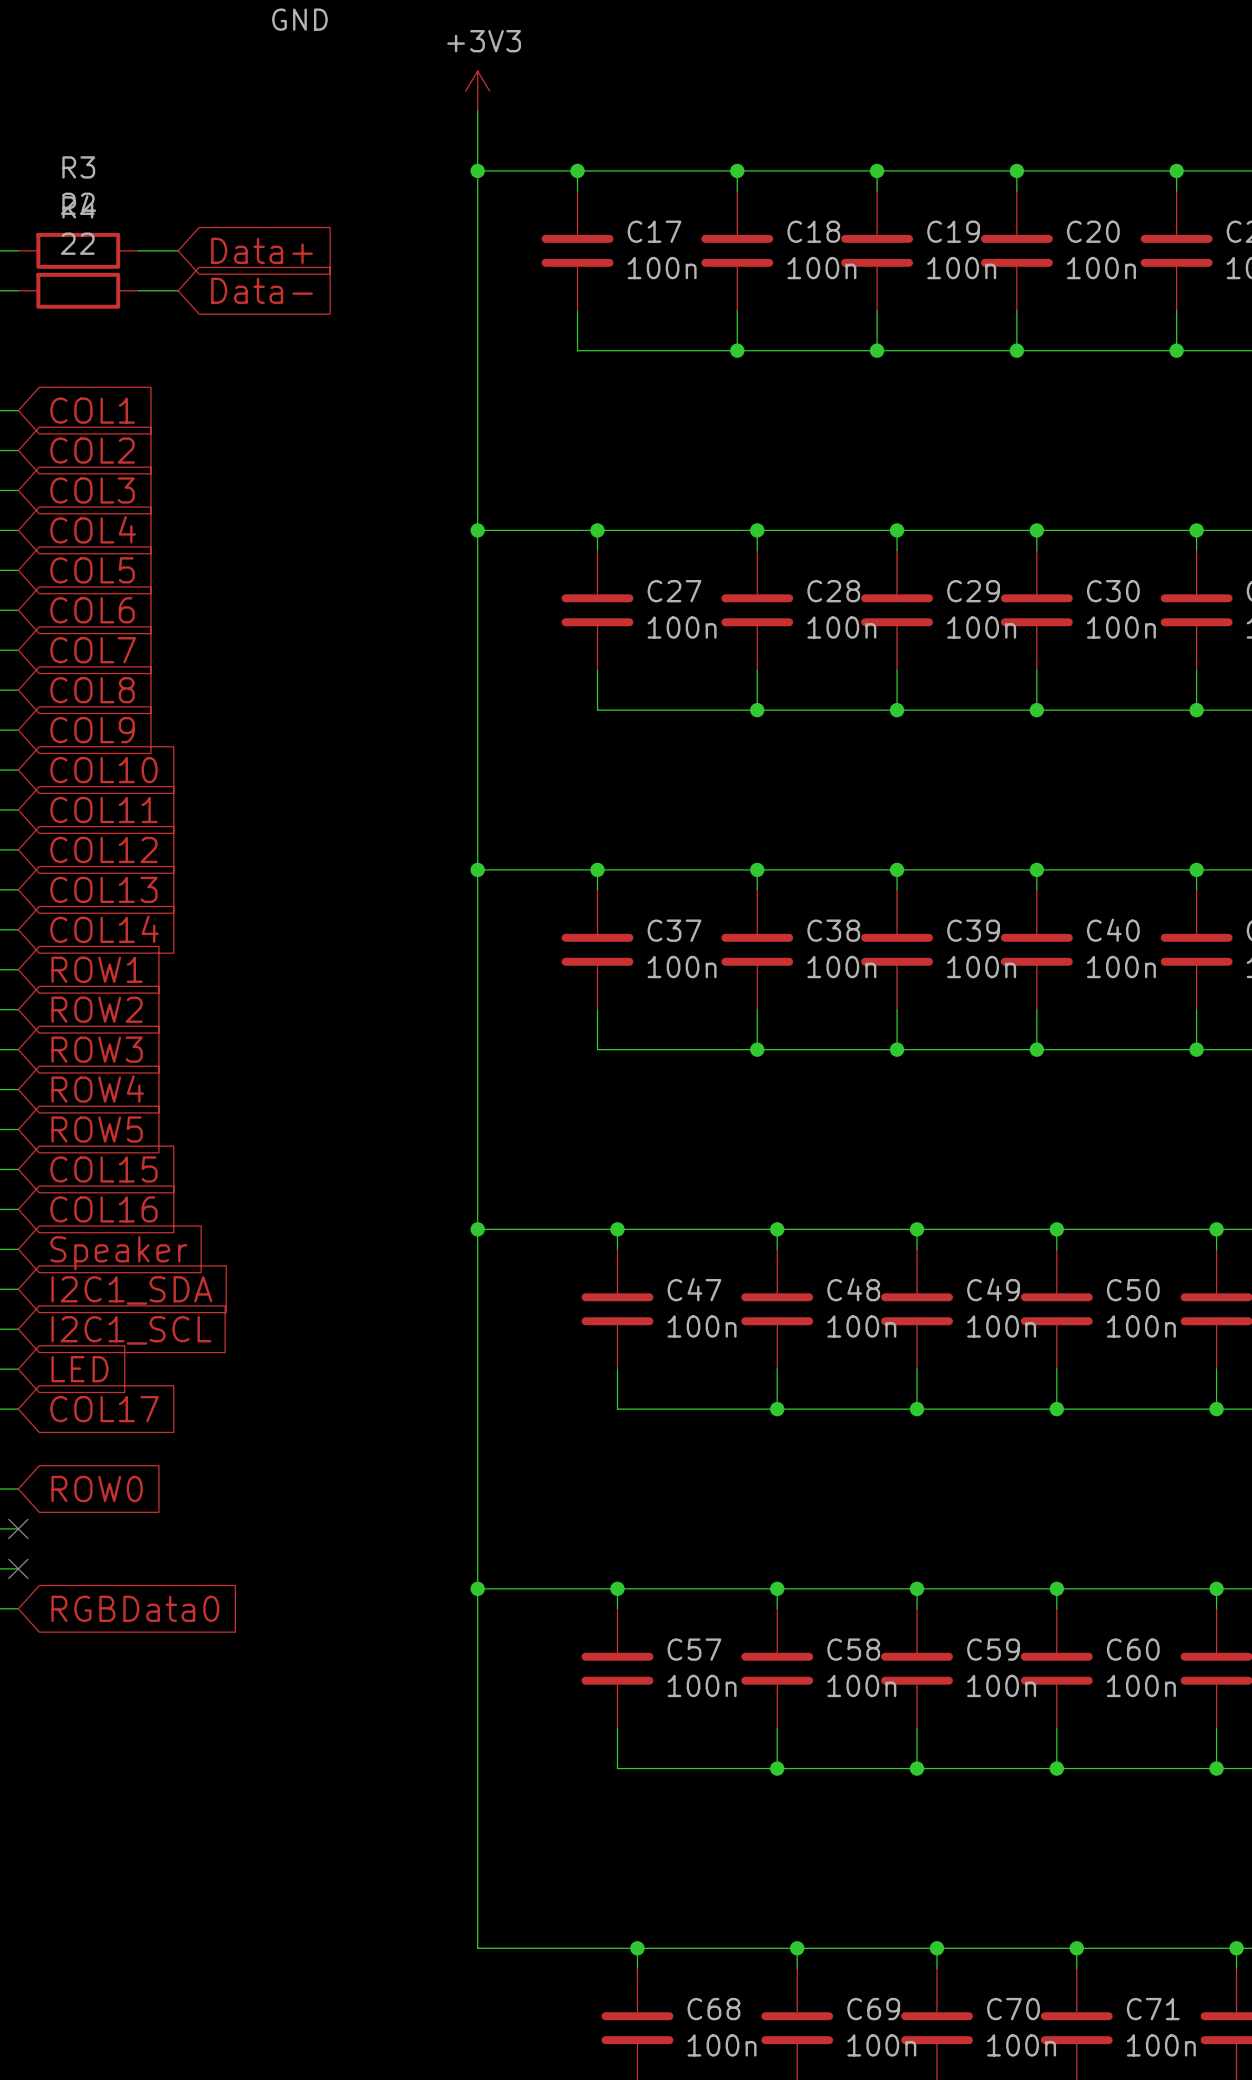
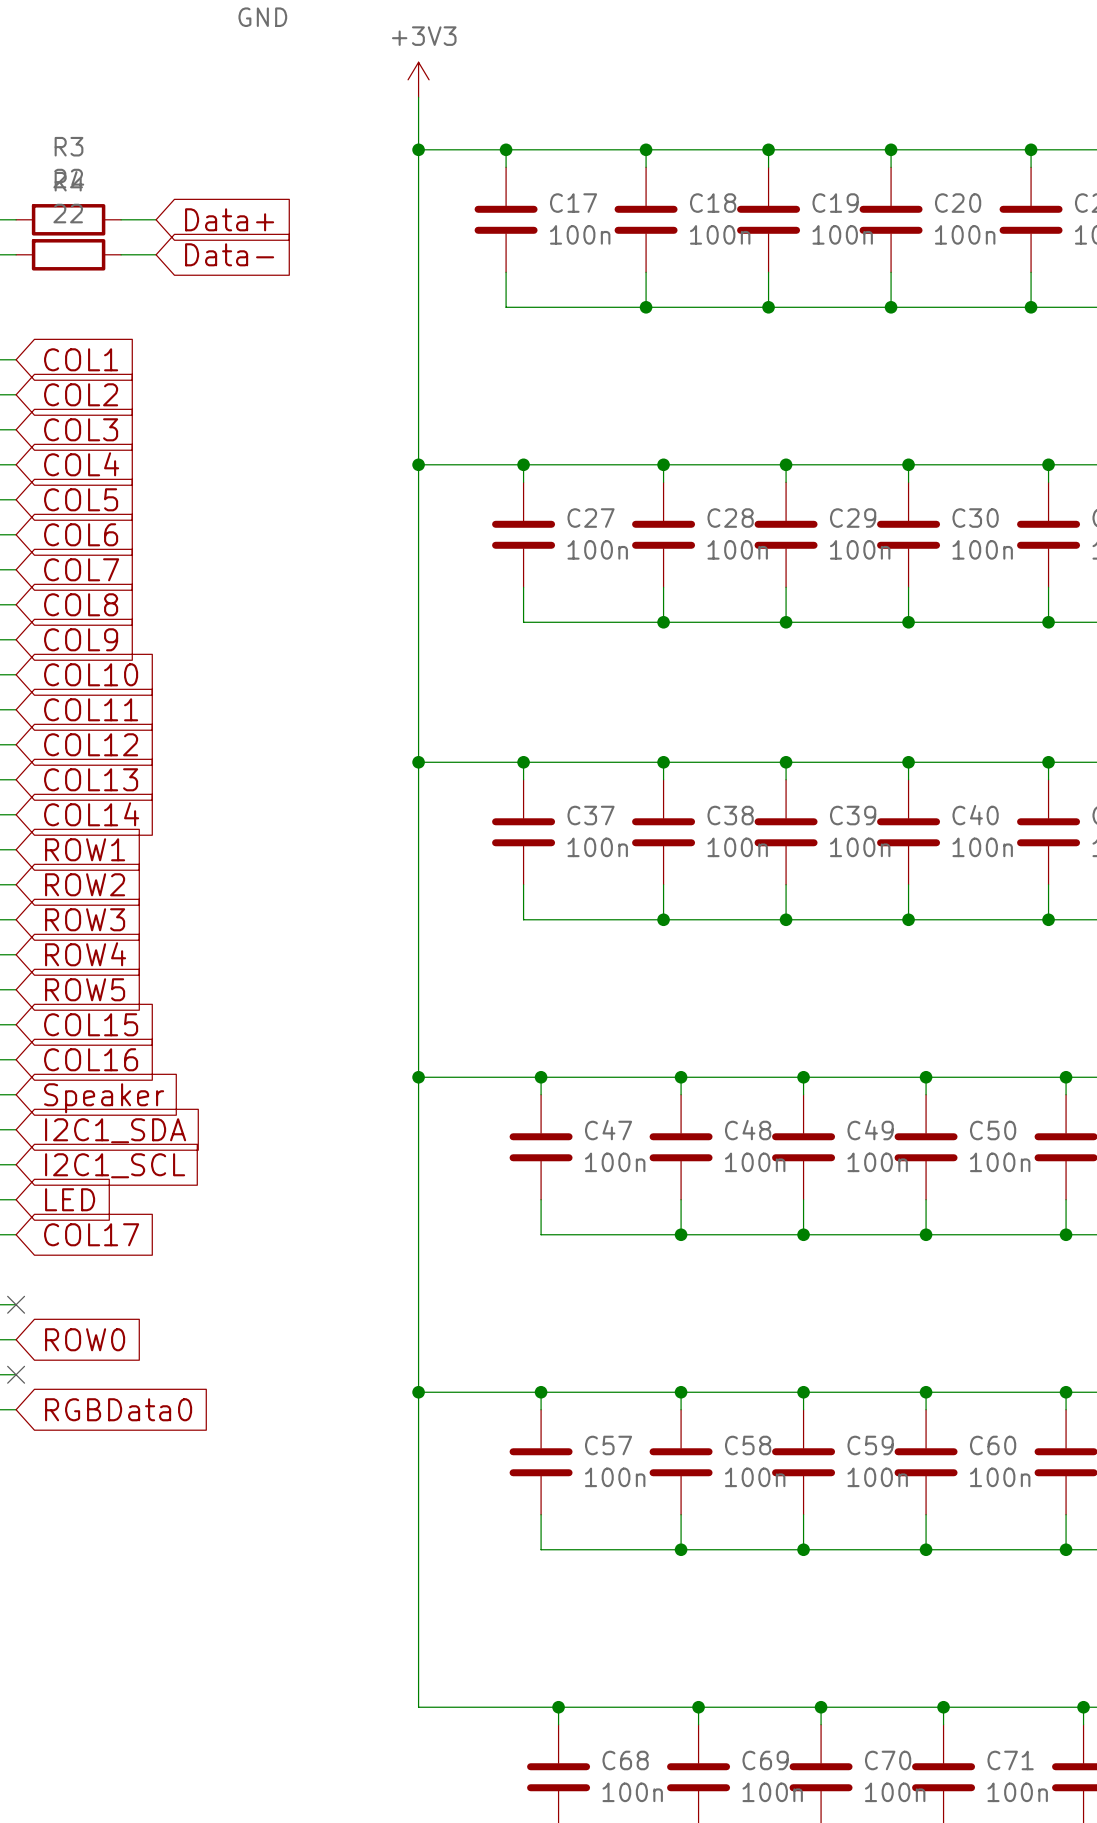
global label position: ROW0 (97, 1488) -> ROW0 (85, 1339)
no-connect mark position: (18, 1528) -> (16, 1304)

